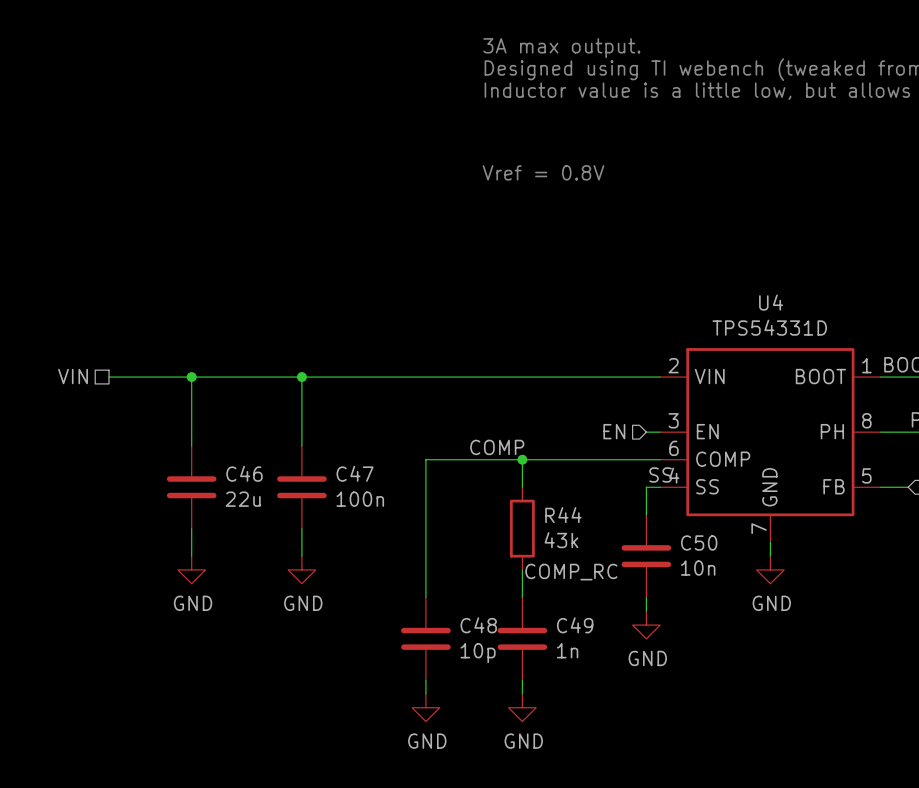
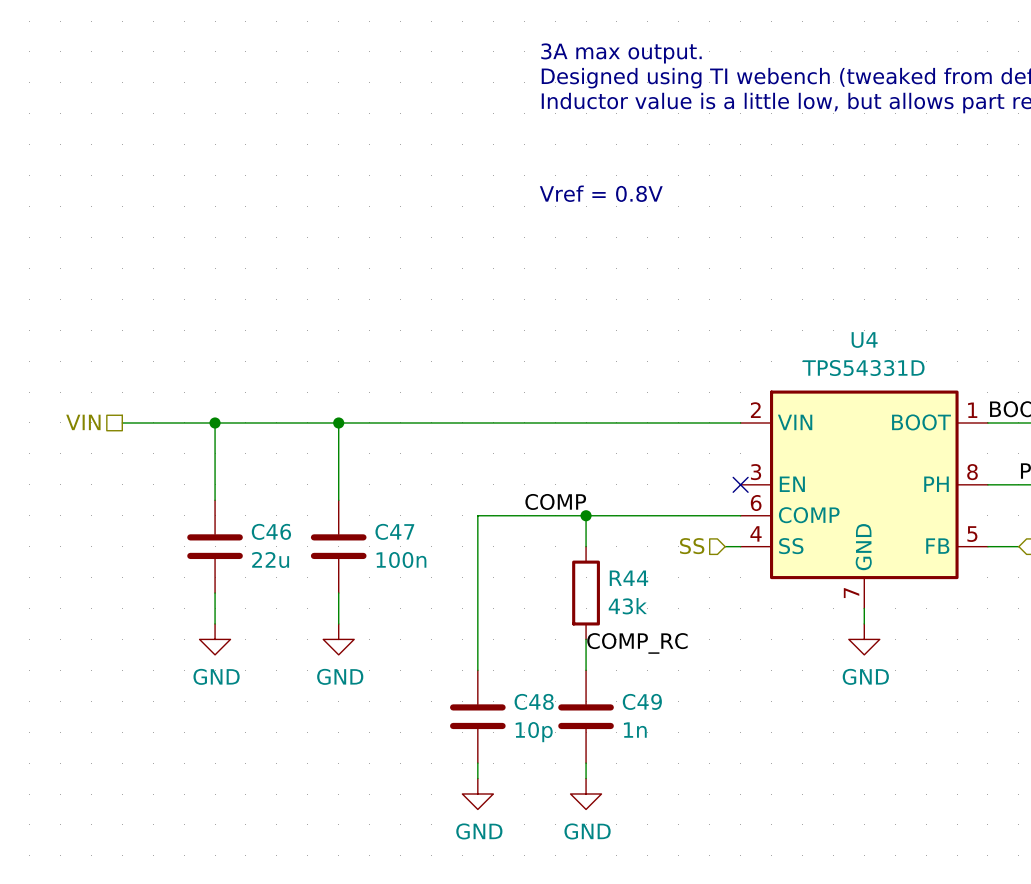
hierarchical label: EN (614, 431) -> none
wire: (646, 432) (660, 432) -> none
no-connect mark: none -> (740, 484)
label: SS (660, 474) -> none
hierarchical label: none -> SS (692, 546)
wire: (646, 487) (646, 514) -> none
C50: 10n (646, 556) -> none
wire: (646, 597) (646, 611) -> none
power symbol: GND (646, 625) -> none

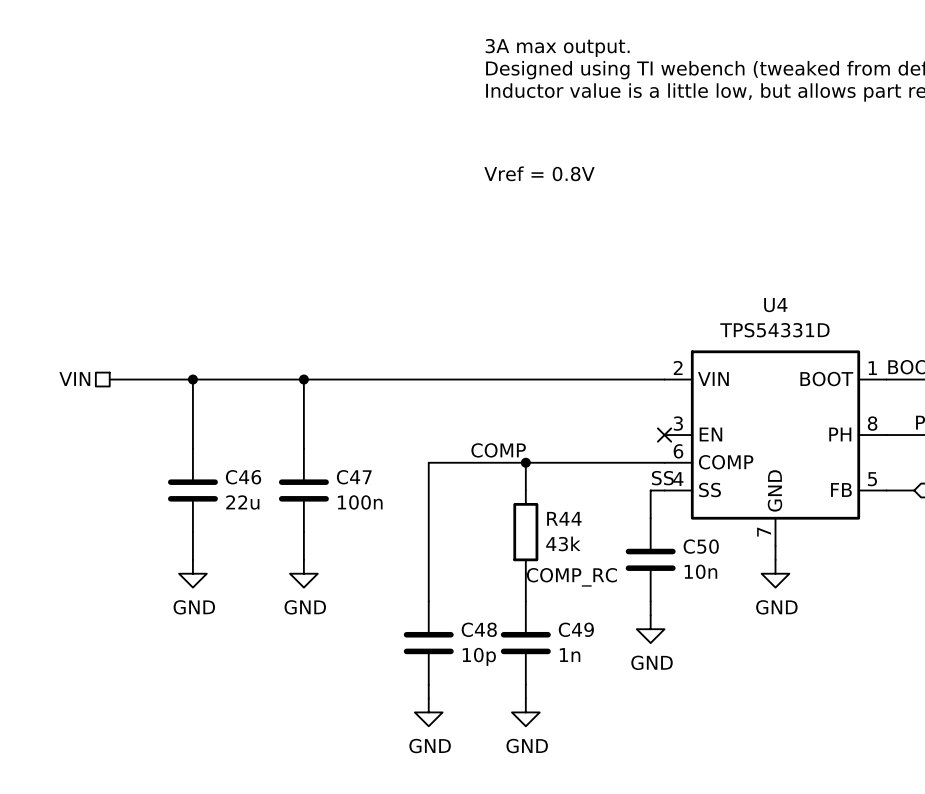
label: none -> SS (662, 478)
hierarchical label: SS (692, 546) -> none
wire: none -> (650, 490) (650, 518)
C50: none -> 10n (650, 559)
wire: none -> (650, 601) (650, 615)
power symbol: none -> GND (650, 629)

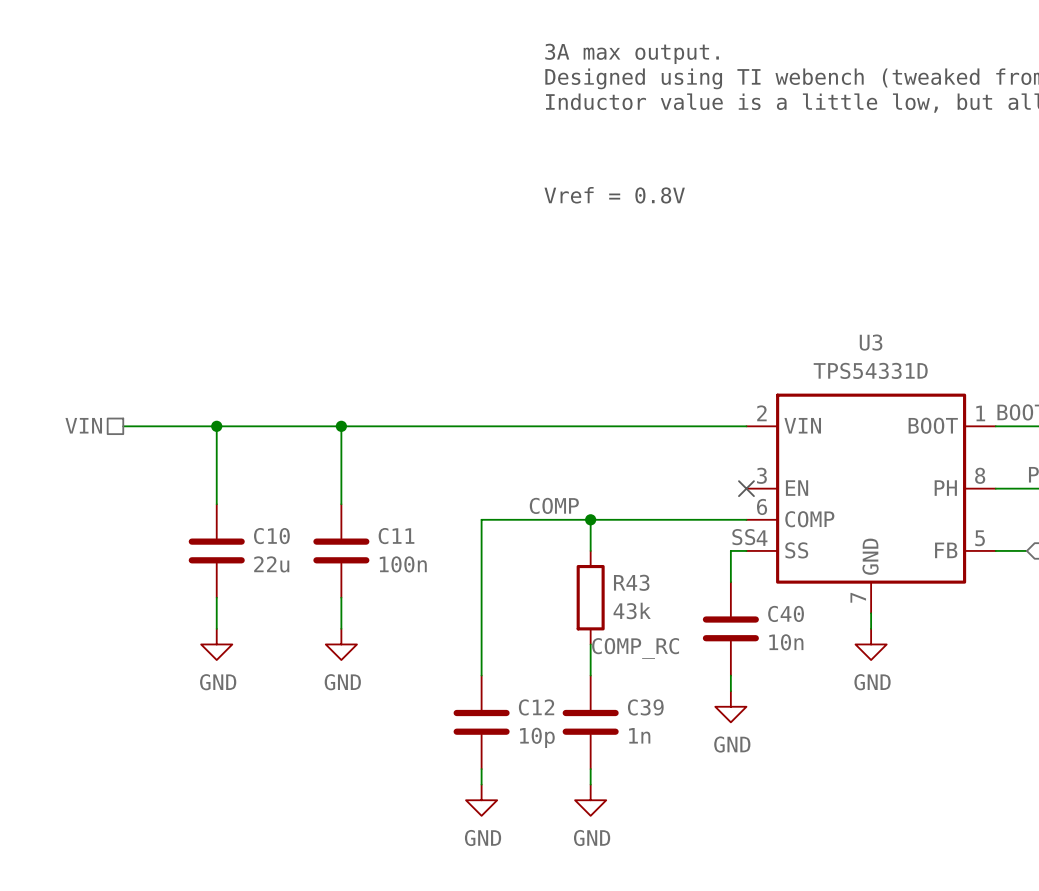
U4 name: U4 (775, 305) -> U3 (871, 342)
C46 name: C46 (243, 477) -> C10 (271, 536)
C47 name: C47 (354, 477) -> C11 (396, 536)
R44 name: R44 (564, 518) -> R43 (631, 582)
C50 name: C50 (701, 546) -> C40 (786, 613)
C48 name: C48 (479, 629) -> C12 (536, 707)
C49 name: C49 (576, 629) -> C39 (645, 707)

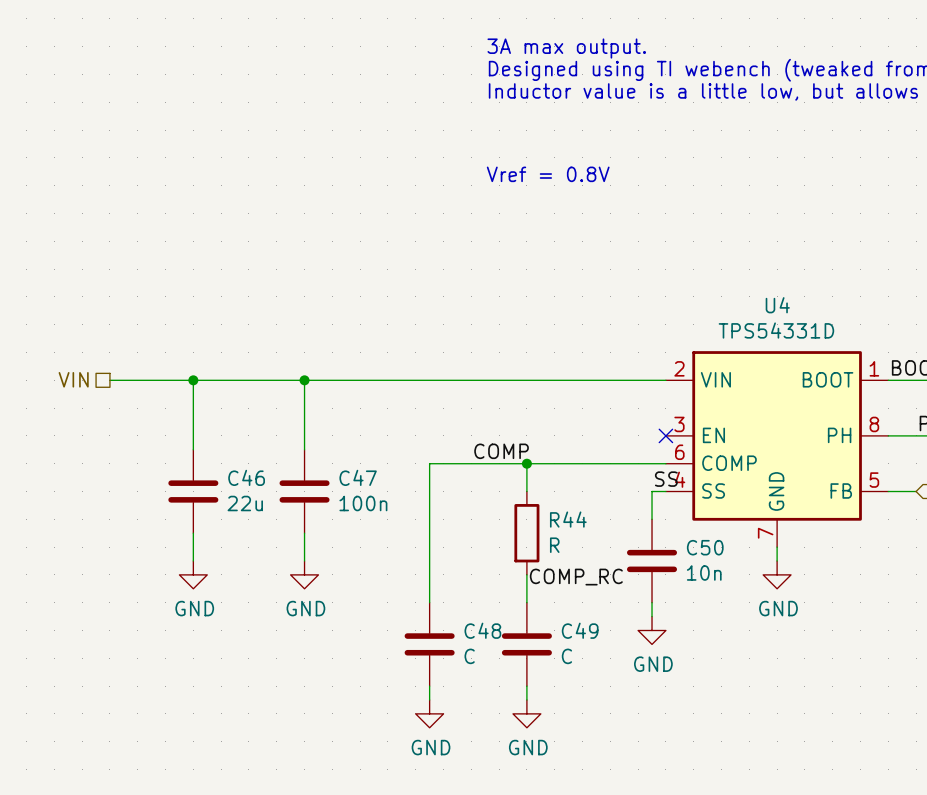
U3 name: U3 (871, 342) -> U4 (777, 305)
C10 name: C10 (271, 536) -> C46 (246, 477)
C11 name: C11 (396, 536) -> C47 (358, 477)
R43 name: R43 (631, 582) -> R44 (568, 519)
R43 value: 43k (632, 610) -> R (554, 545)
C40 name: C40 (786, 613) -> C50 (705, 547)
C12 name: C12 (536, 707) -> C48 (482, 630)
C39 name: C39 (645, 707) -> C49 (580, 630)
C39 value: 1n (639, 735) -> C (566, 656)
C12 value: 10p (537, 737) -> C (469, 656)

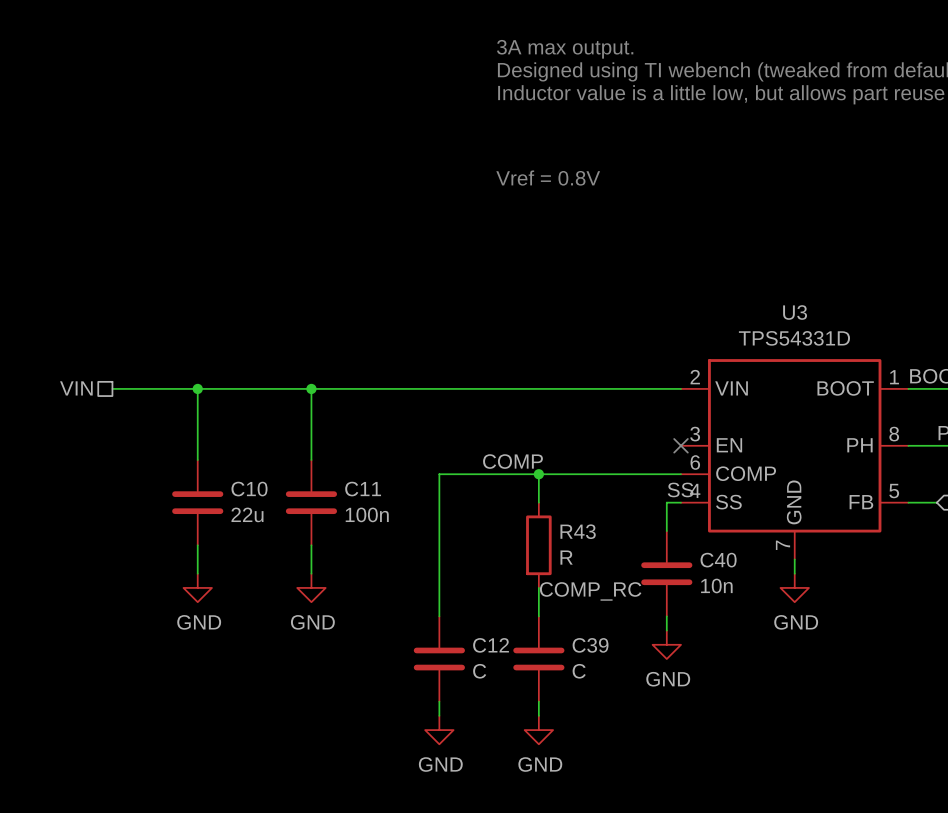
U4 name: U4 (777, 305) -> U3 (795, 312)
C46 name: C46 (246, 477) -> C10 (249, 489)
C47 name: C47 (358, 477) -> C11 (363, 489)
R44 name: R44 (568, 519) -> R43 (578, 531)
C50 name: C50 (705, 547) -> C40 (718, 560)
C48 name: C48 (482, 630) -> C12 (491, 645)
C49 name: C49 (580, 630) -> C39 (590, 645)

